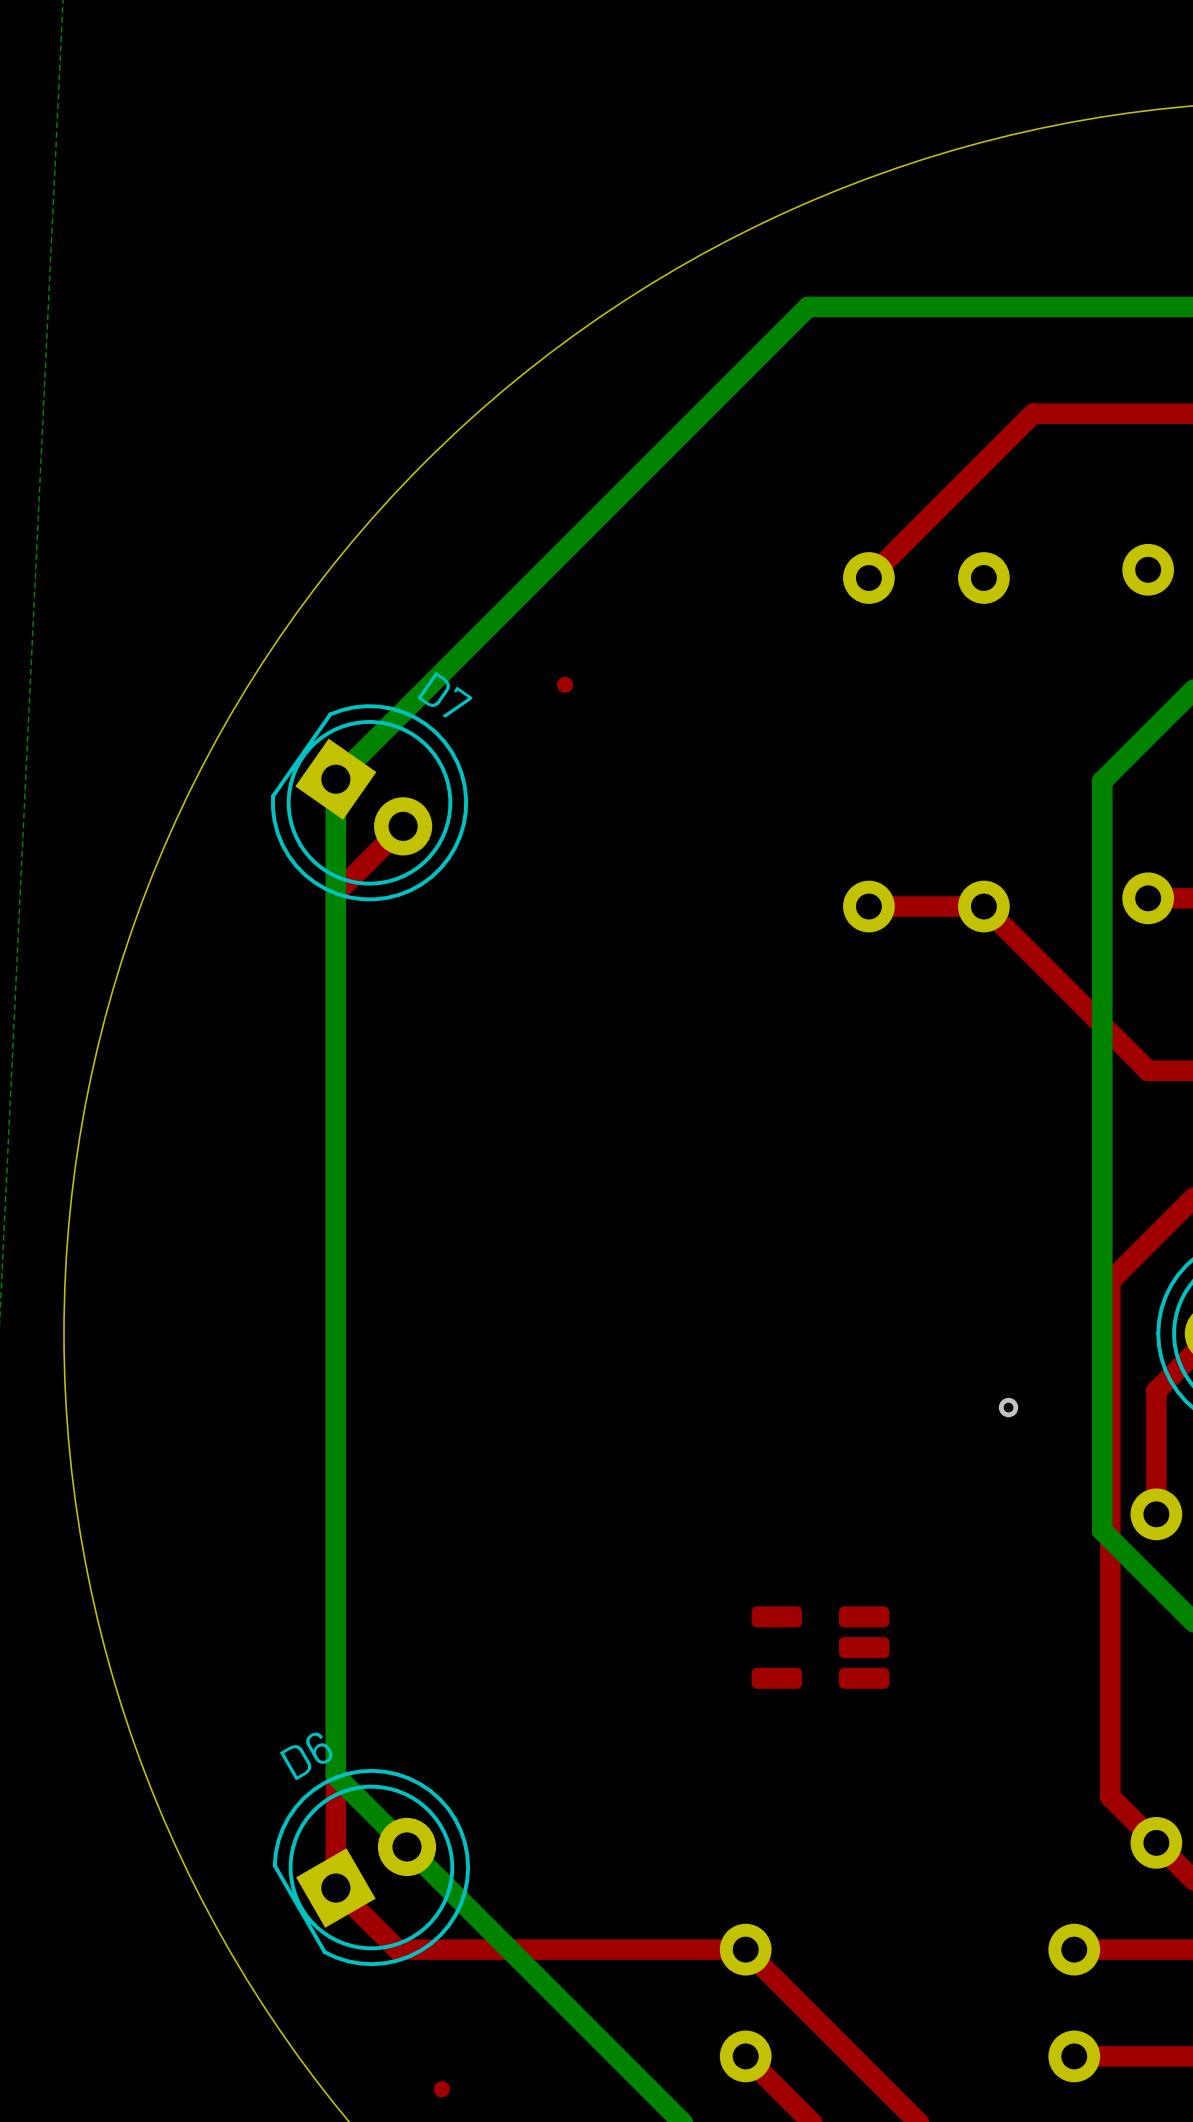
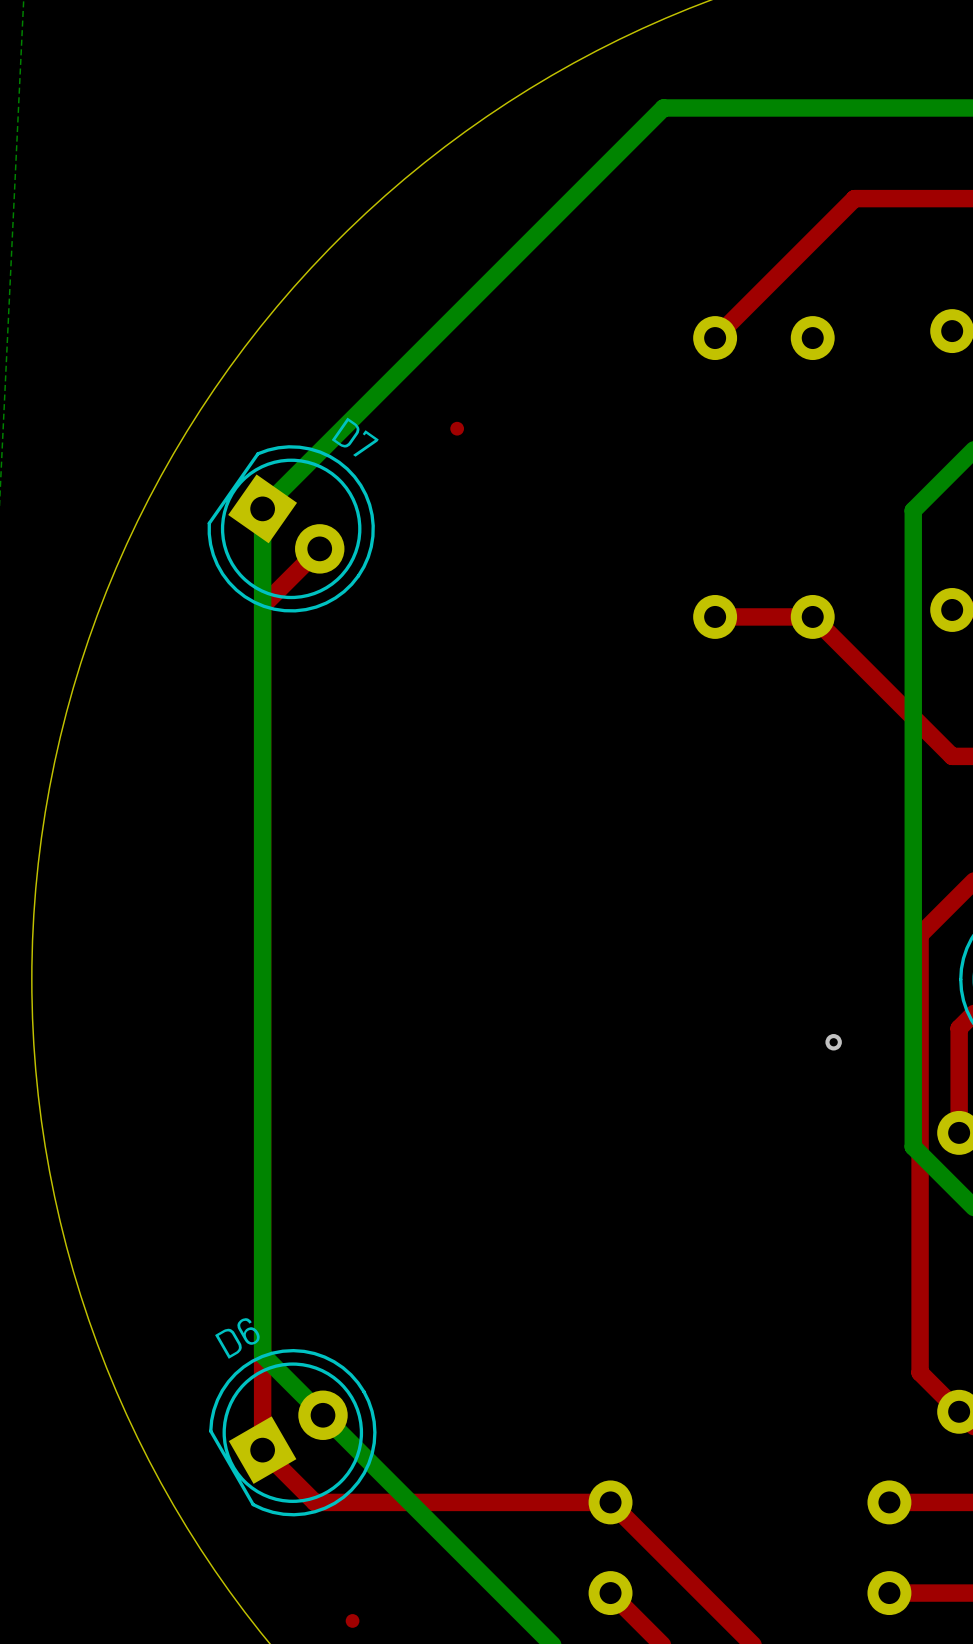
part: (820, 1647) -> none

